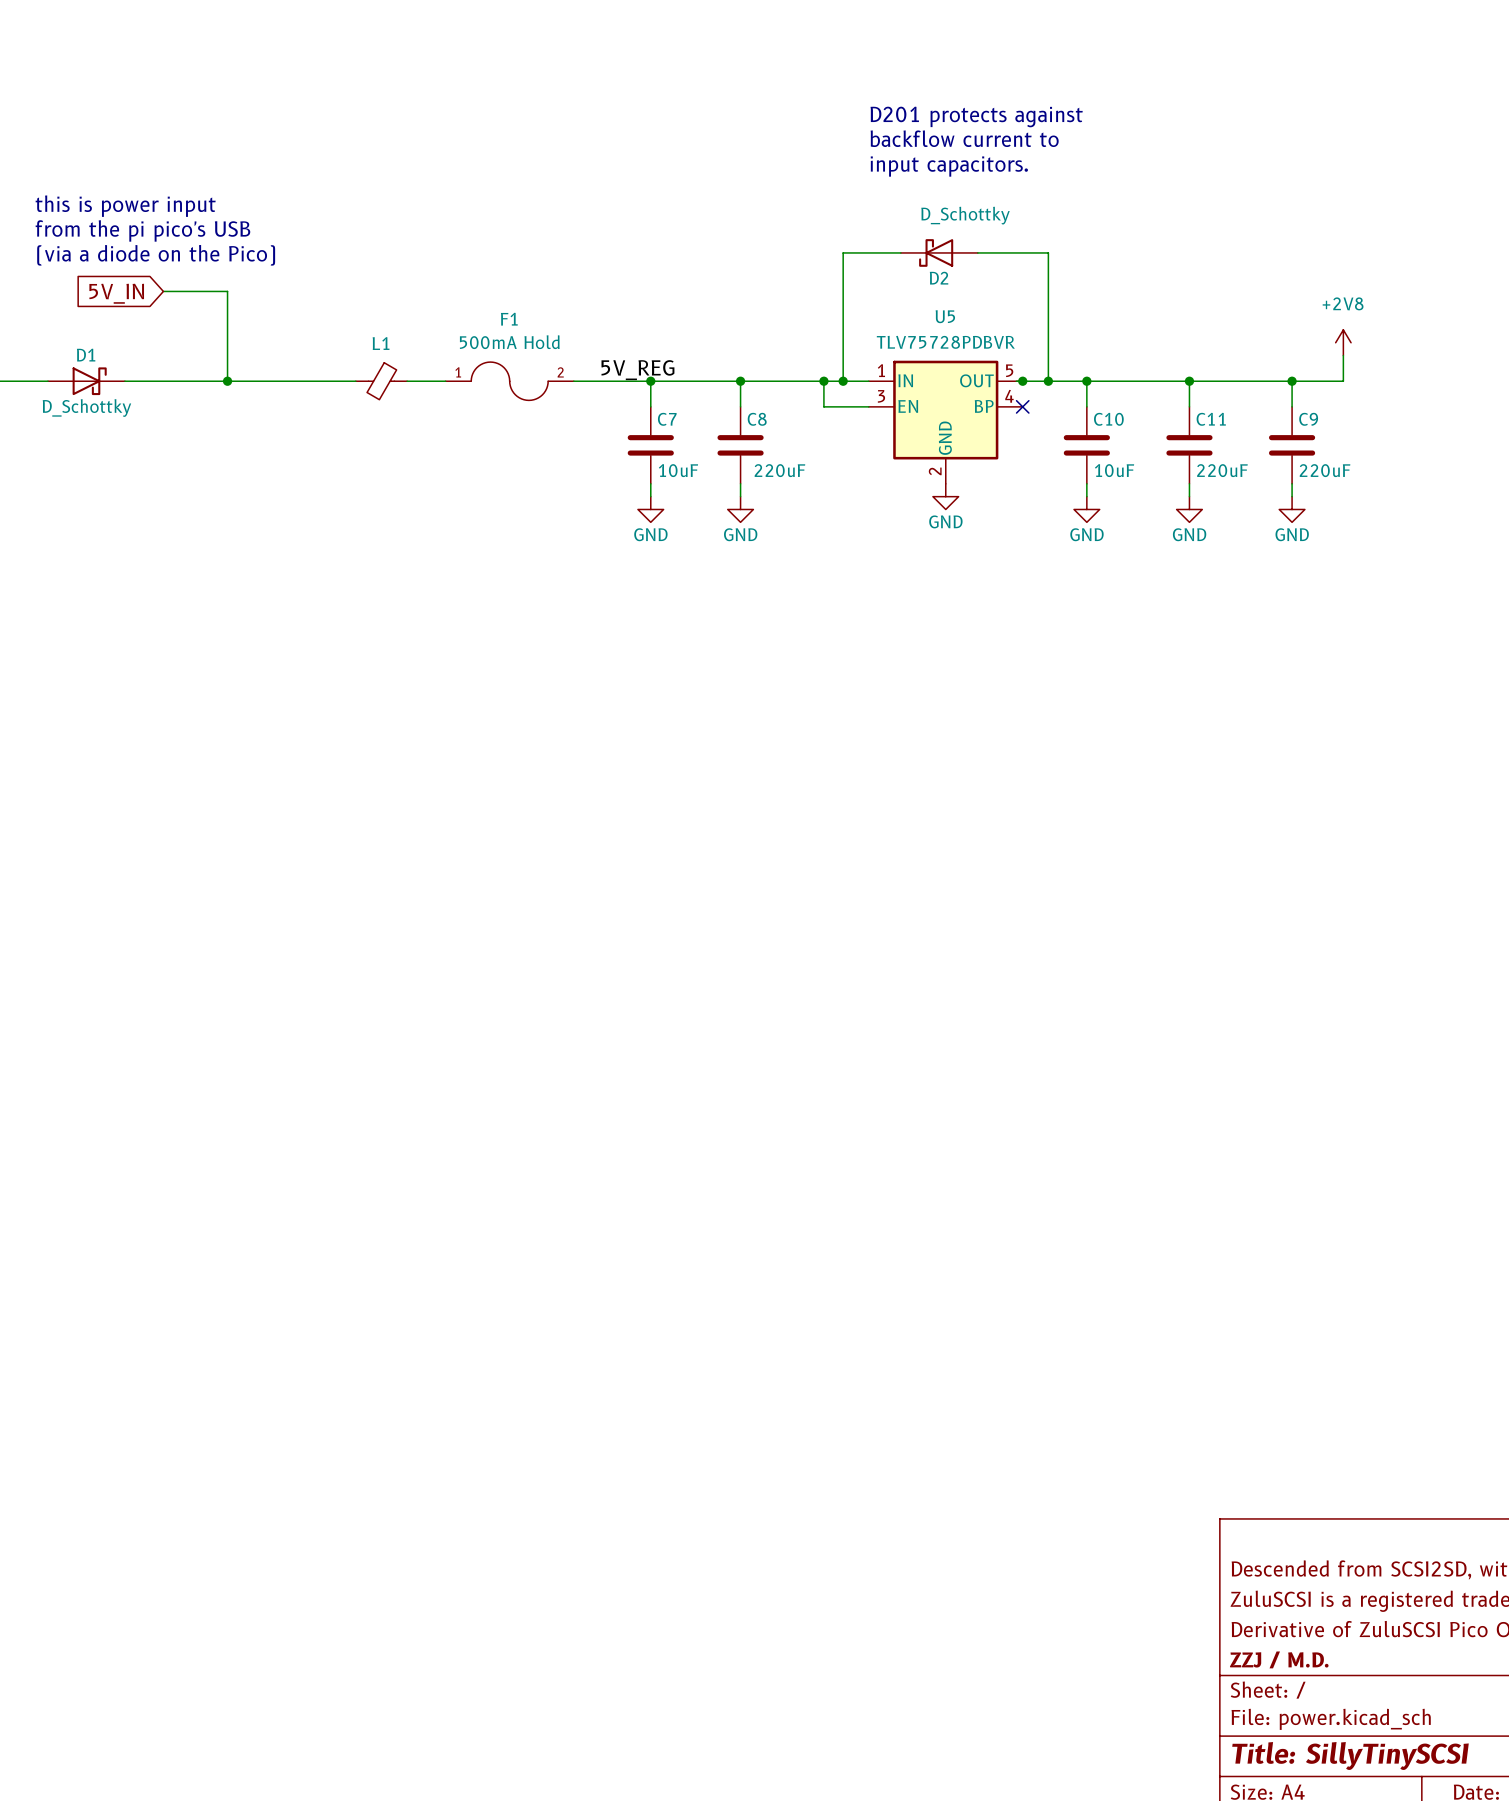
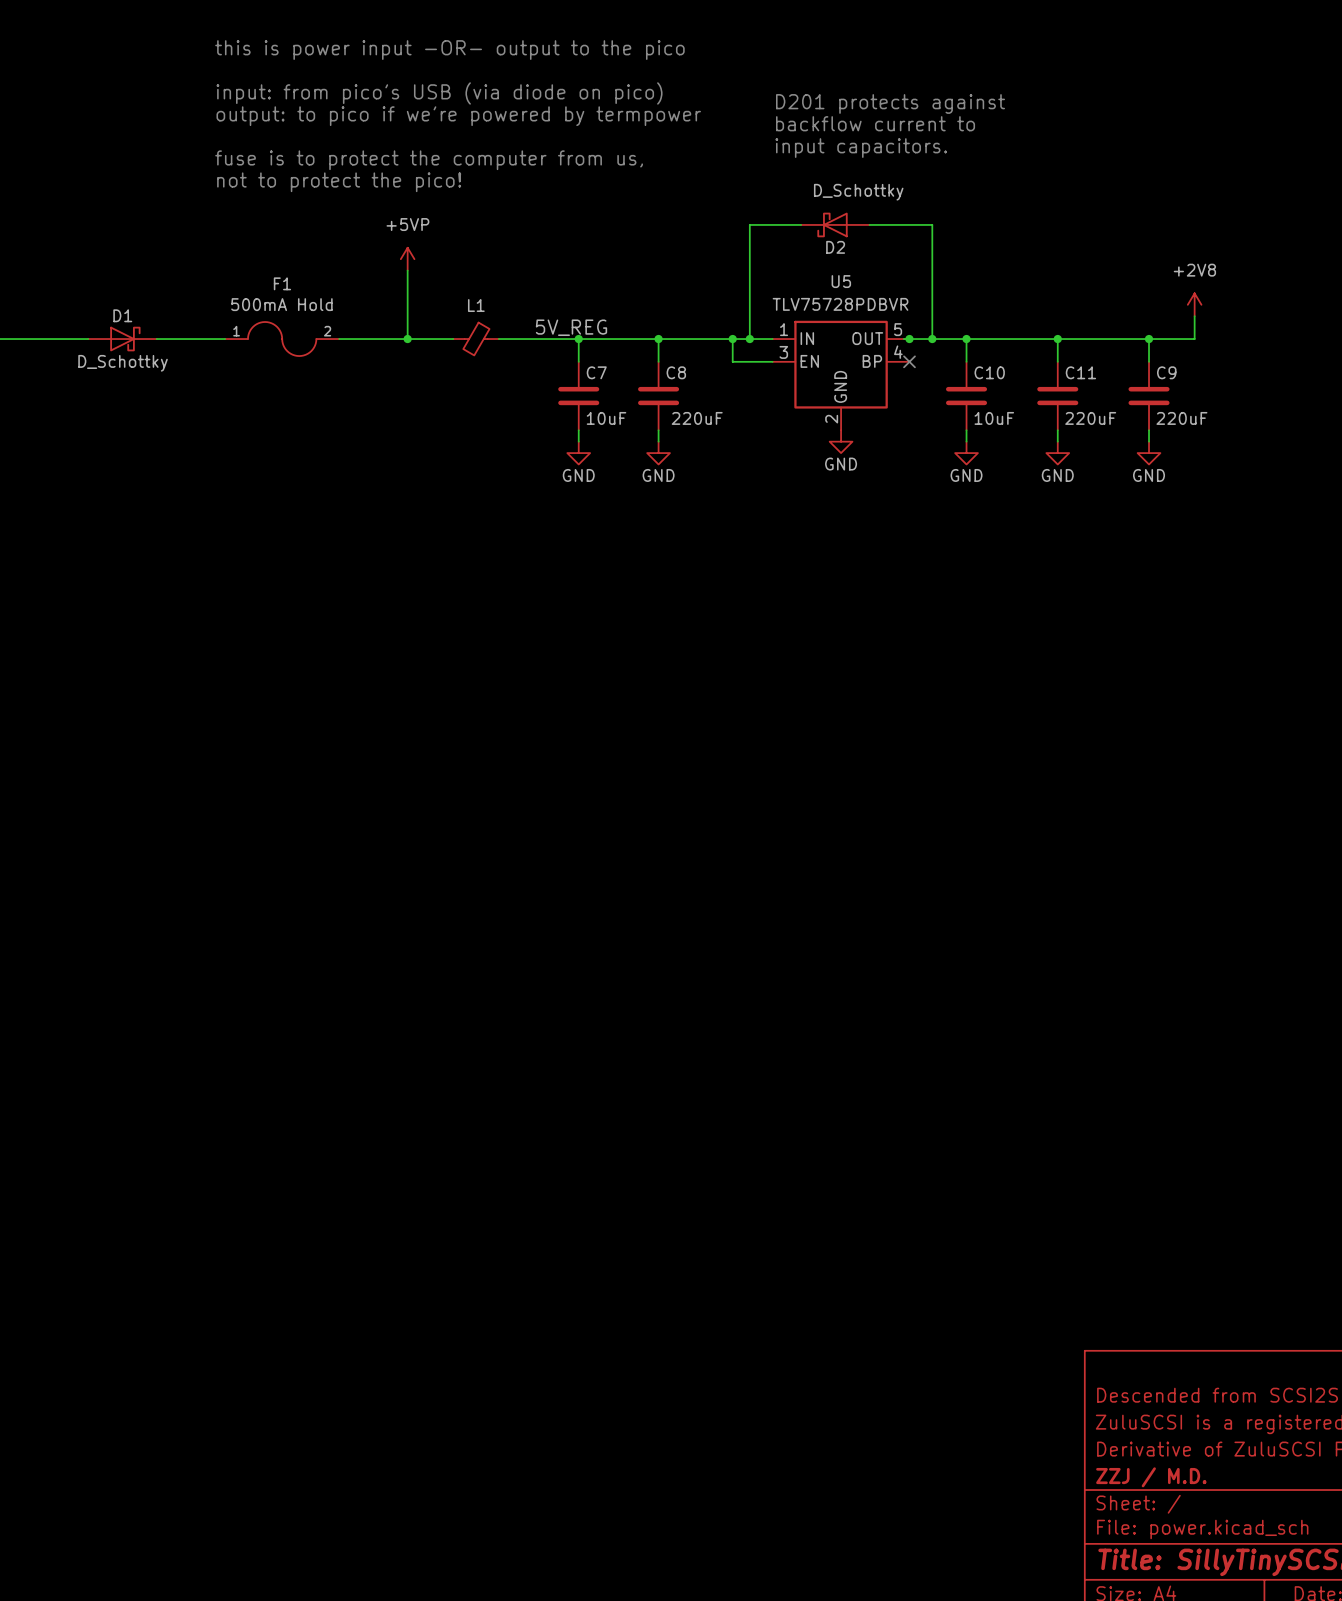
text: none -> this is power input -OR- output to the pico (449, 50)
text: none -> input: from pico's USB (via diode on pico) (439, 93)
text: none -> output: to pico if we're powered by termpower (458, 116)
text: none -> fuse is to protect the computer from us, (429, 160)
text: none -> not to protect the pico! (339, 182)
text: this is power input (125, 206) -> none
text: from the pi pico's USB (142, 230) -> none
text: (via a diode on the Pico) (156, 255) -> none
wire: (163, 291) (227, 291) (227, 381) -> none
power symbol: none -> +5VP (407, 259)
global label: 5V_IN (116, 293) -> none
wire: none -> (407, 270) (407, 339)
D1 position: (86, 381) -> (122, 339)
junction: (227, 381) -> none
wire: (253, 381) (355, 381) -> none
L1 position: (381, 381) -> (476, 339)
wire: none -> (396, 339) (453, 339)
junction: none -> (407, 339)
F1 position: (509, 381) -> (282, 339)

